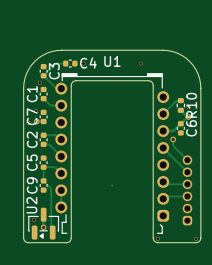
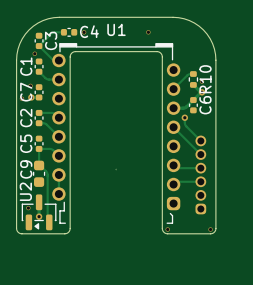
C9 footprint: [39, 178, 48, 193] -> [32, 160, 46, 187]

